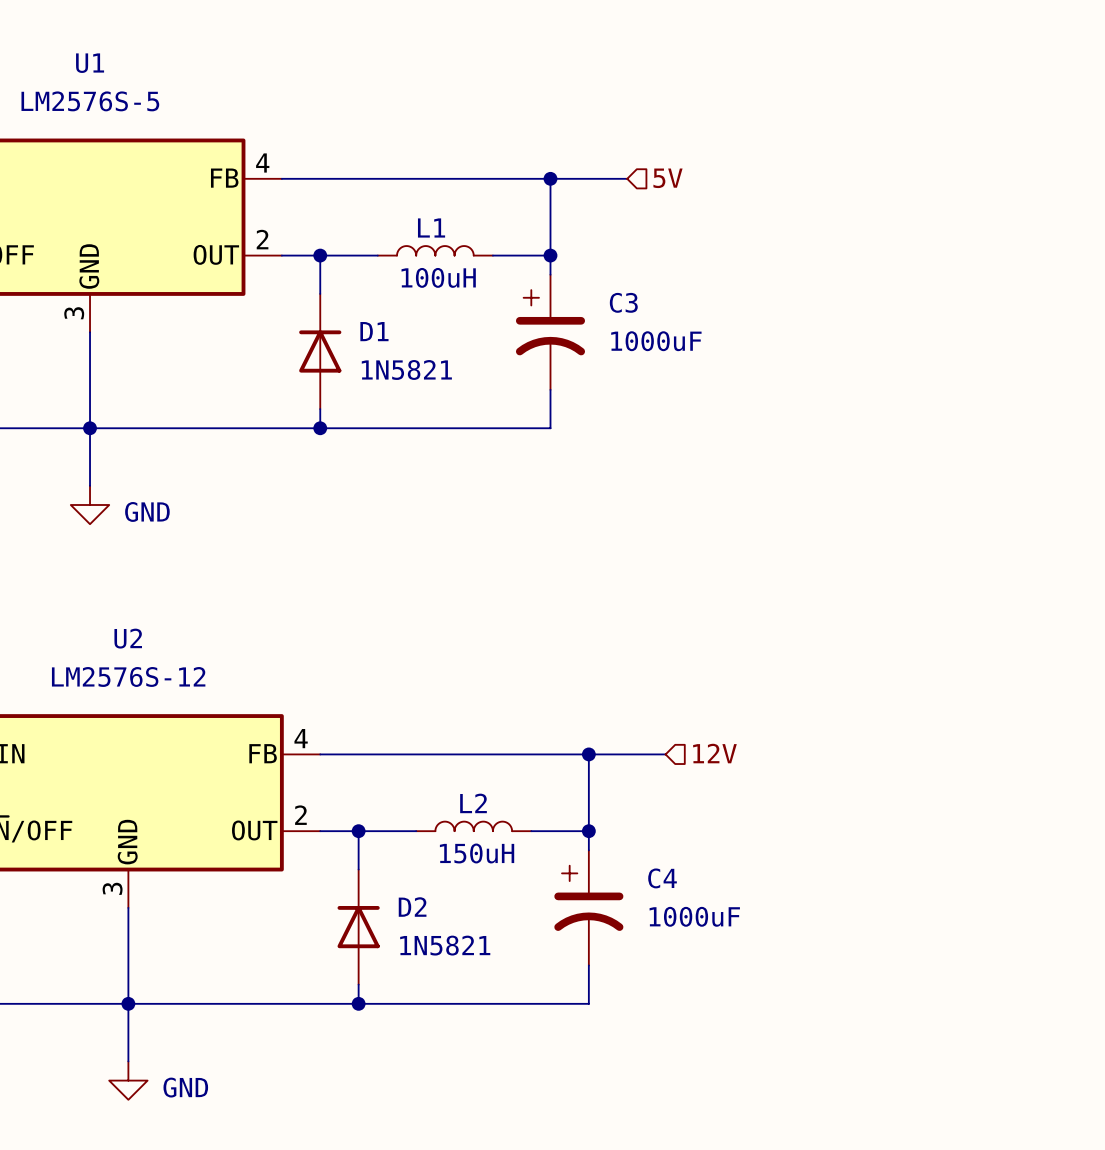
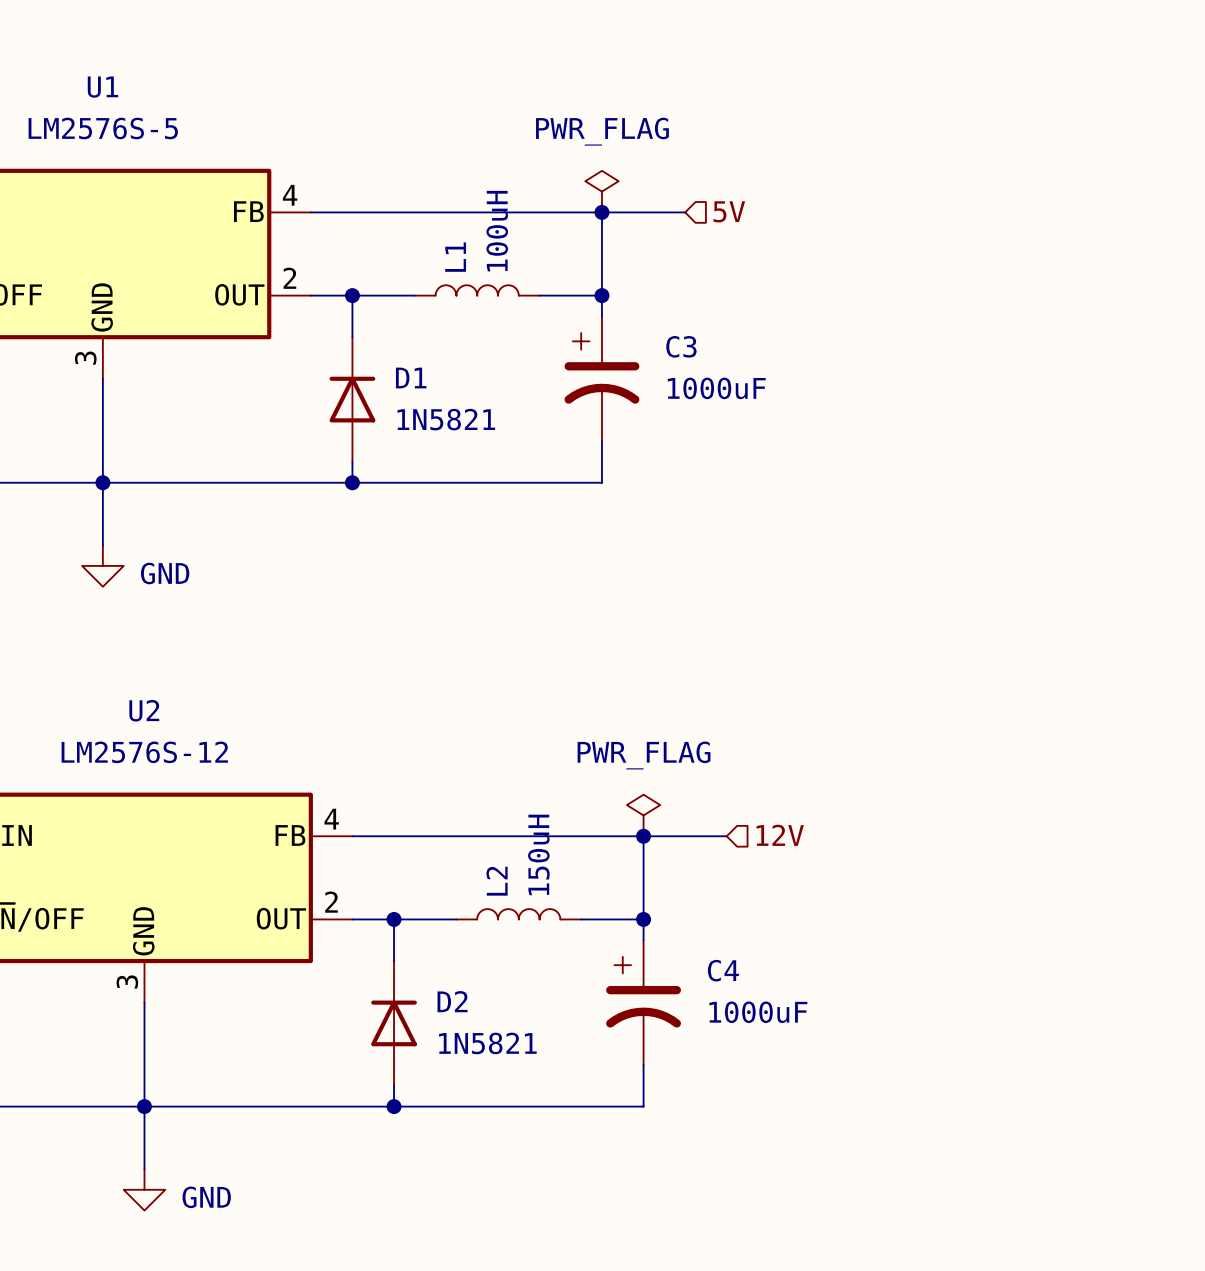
power symbol: none -> PWR_FLAG (601, 191)
L1 name rotation: 0° (431, 227) -> 90° counterclockwise (455, 257)
L1 value rotation: 0° (438, 277) -> 90° counterclockwise (497, 231)
power symbol: none -> PWR_FLAG (643, 815)
L2 name rotation: 0° (473, 803) -> 90° counterclockwise (497, 881)
L2 value rotation: 0° (477, 853) -> 90° counterclockwise (538, 854)

